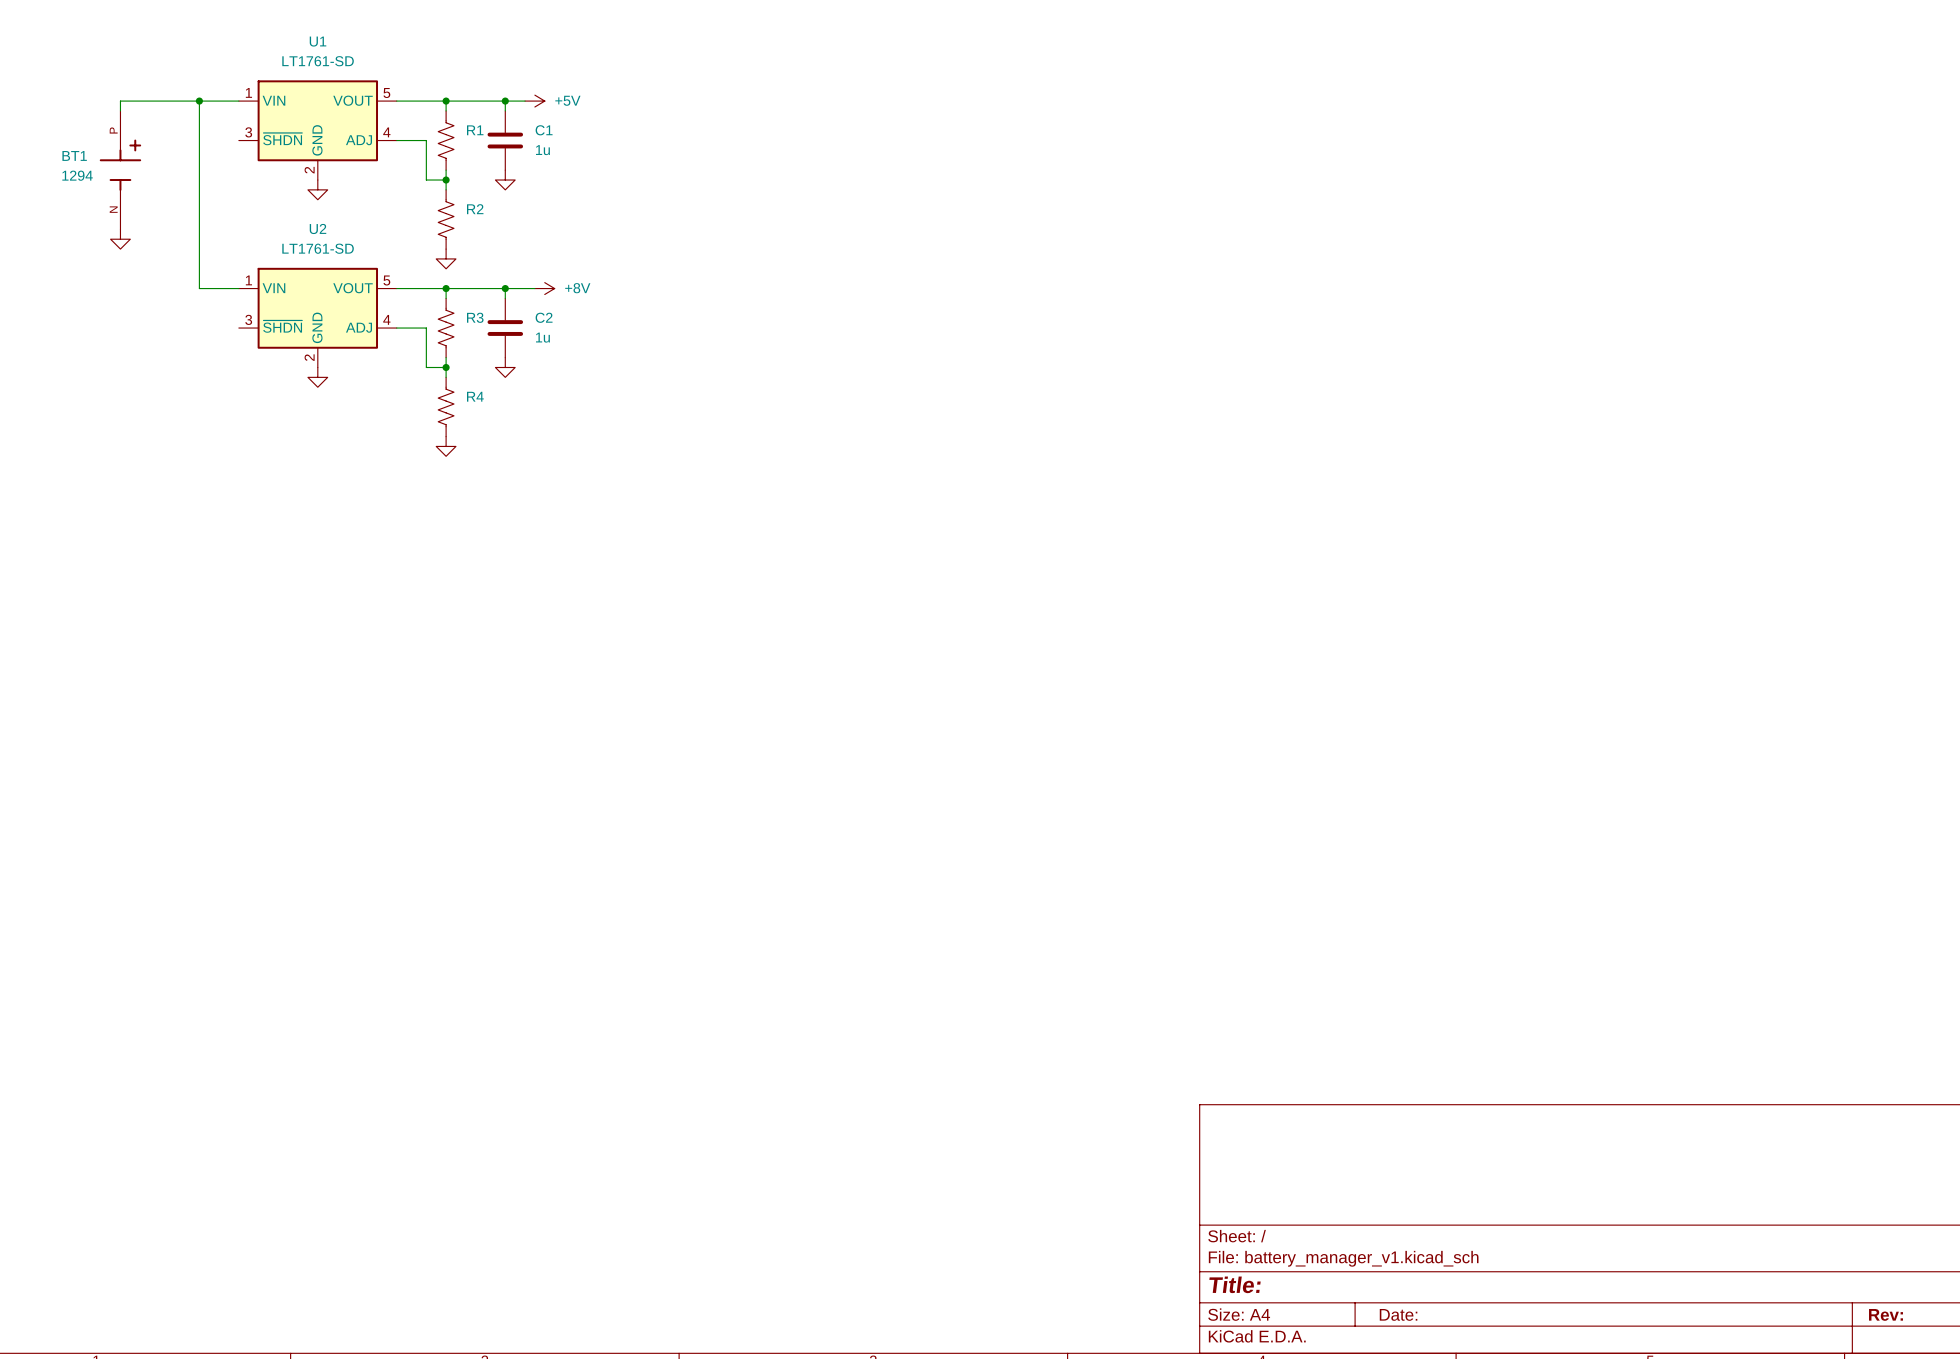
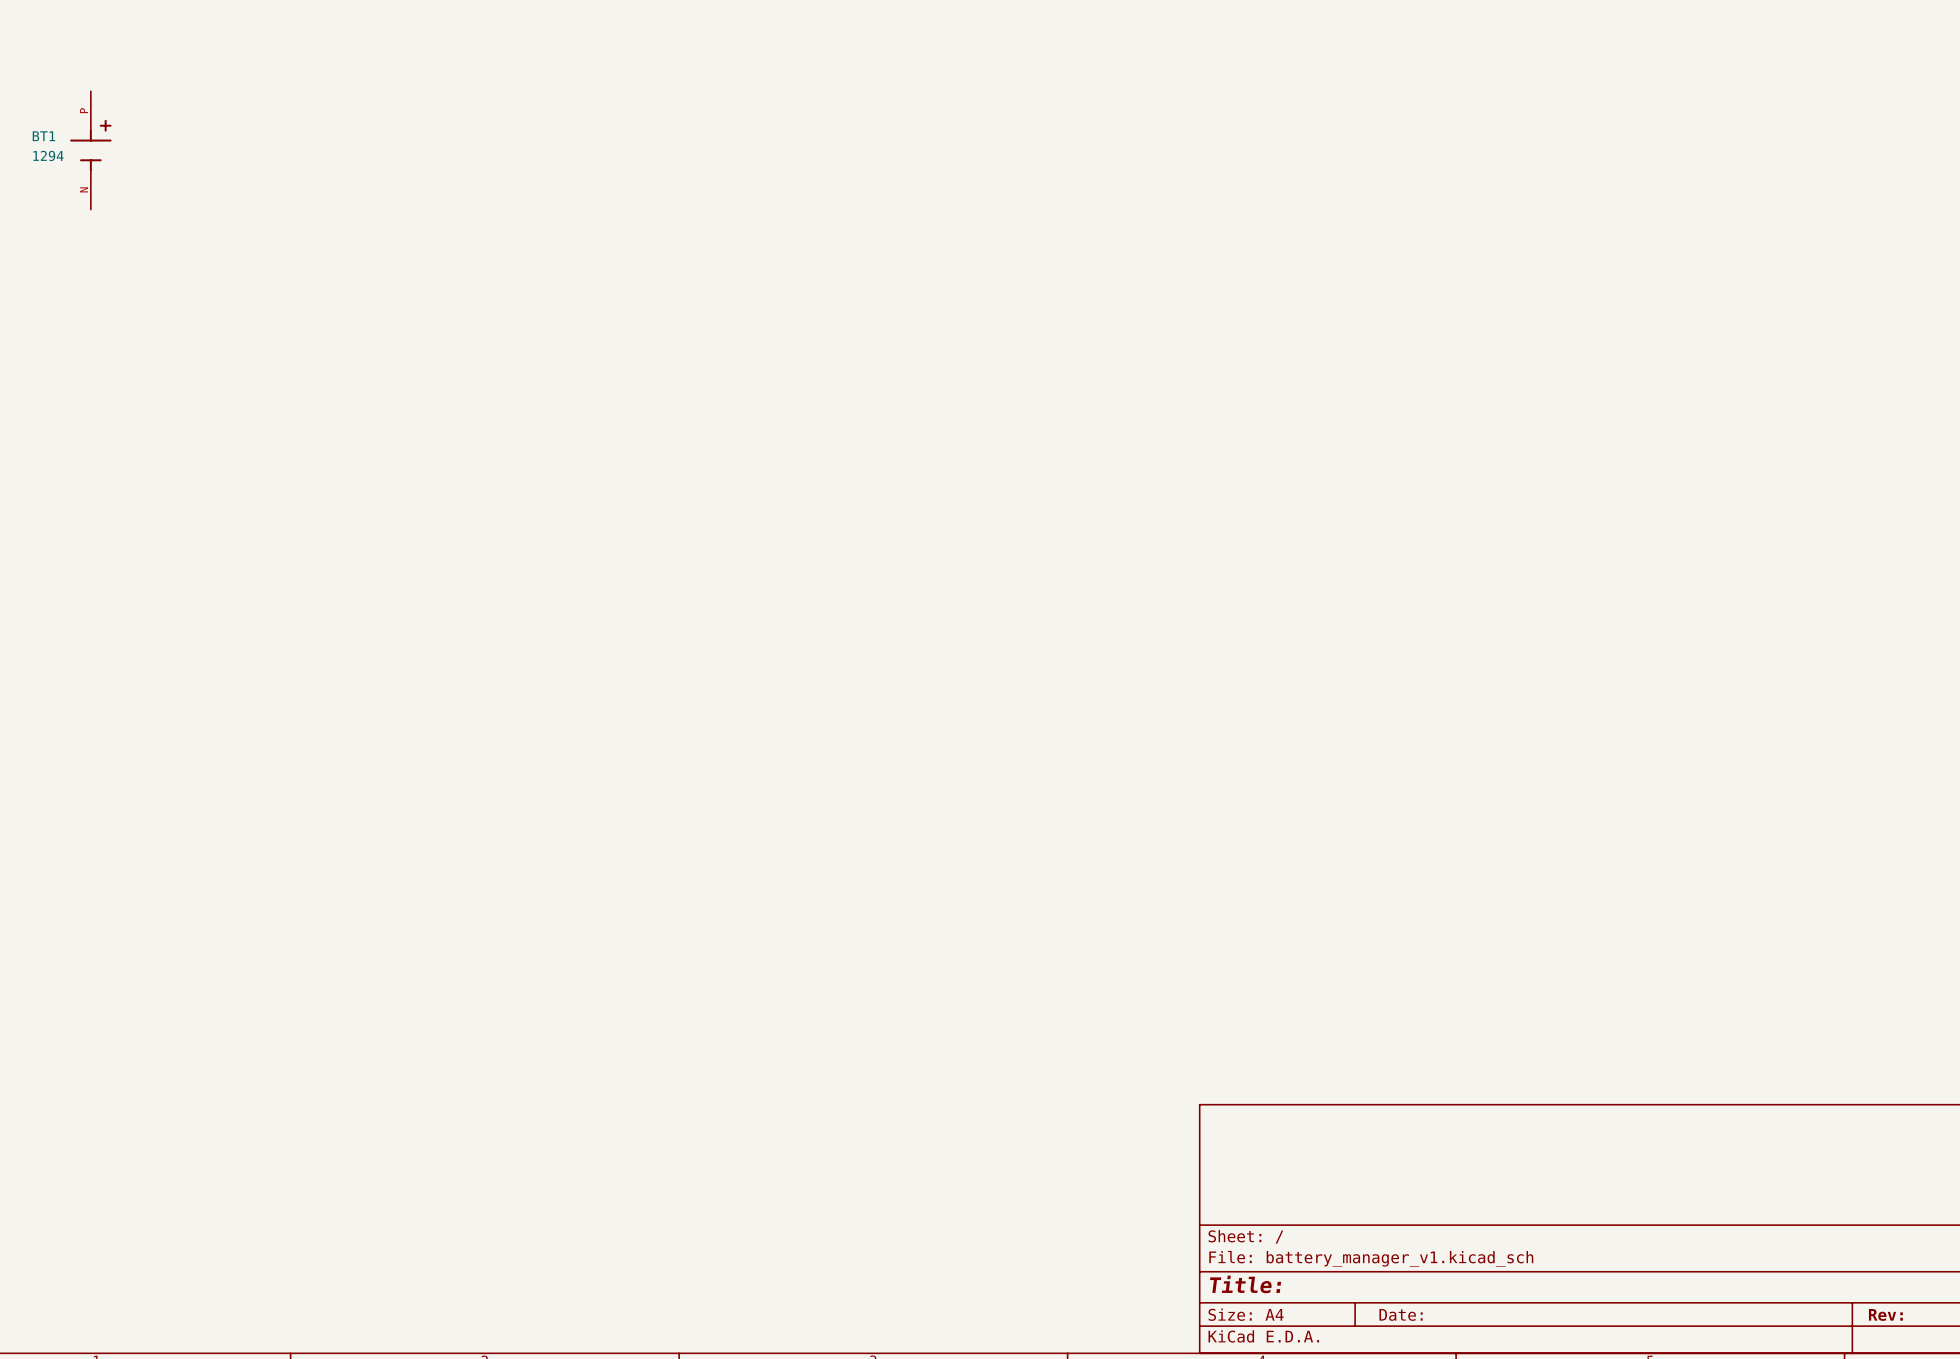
wire: (199, 101) (199, 288) (238, 288) -> none
junction: (199, 101) -> none
wire: (238, 101) (120, 101) (120, 110) -> none
wire: (396, 101) (525, 101) -> none
wire: (446, 101) (446, 110) -> none
junction: (446, 101) -> none
wire: (505, 101) (505, 110) -> none
junction: (505, 101) -> none
power symbol: +5V (534, 101) -> none
U1: LT1761-SD (317, 130) -> none
wire: (396, 140) (426, 140) (426, 180) (446, 180) -> none
R1: (446, 140) -> none
C1: 1u (505, 140) -> none
BT1 position: (120, 170) -> (90, 150)
wire: (446, 170) (446, 189) -> none
junction: (446, 180) -> none
power symbol: (505, 180) -> none
power symbol: (317, 189) -> none
R2: (446, 219) -> none
power symbol: (120, 239) -> none
power symbol: (446, 258) -> none
wire: (396, 288) (534, 288) -> none
wire: (446, 288) (446, 298) -> none
junction: (446, 288) -> none
wire: (505, 288) (505, 298) -> none
junction: (505, 288) -> none
power symbol: +8V (544, 288) -> none
U2: LT1761-SD (317, 317) -> none
wire: (396, 328) (426, 328) (426, 367) (446, 367) -> none
R3: (446, 328) -> none
C2: 1u (505, 328) -> none
wire: (446, 357) (446, 377) -> none
junction: (446, 367) -> none
power symbol: (505, 367) -> none
power symbol: (317, 377) -> none
R4: (446, 406) -> none
power symbol: (446, 446) -> none

